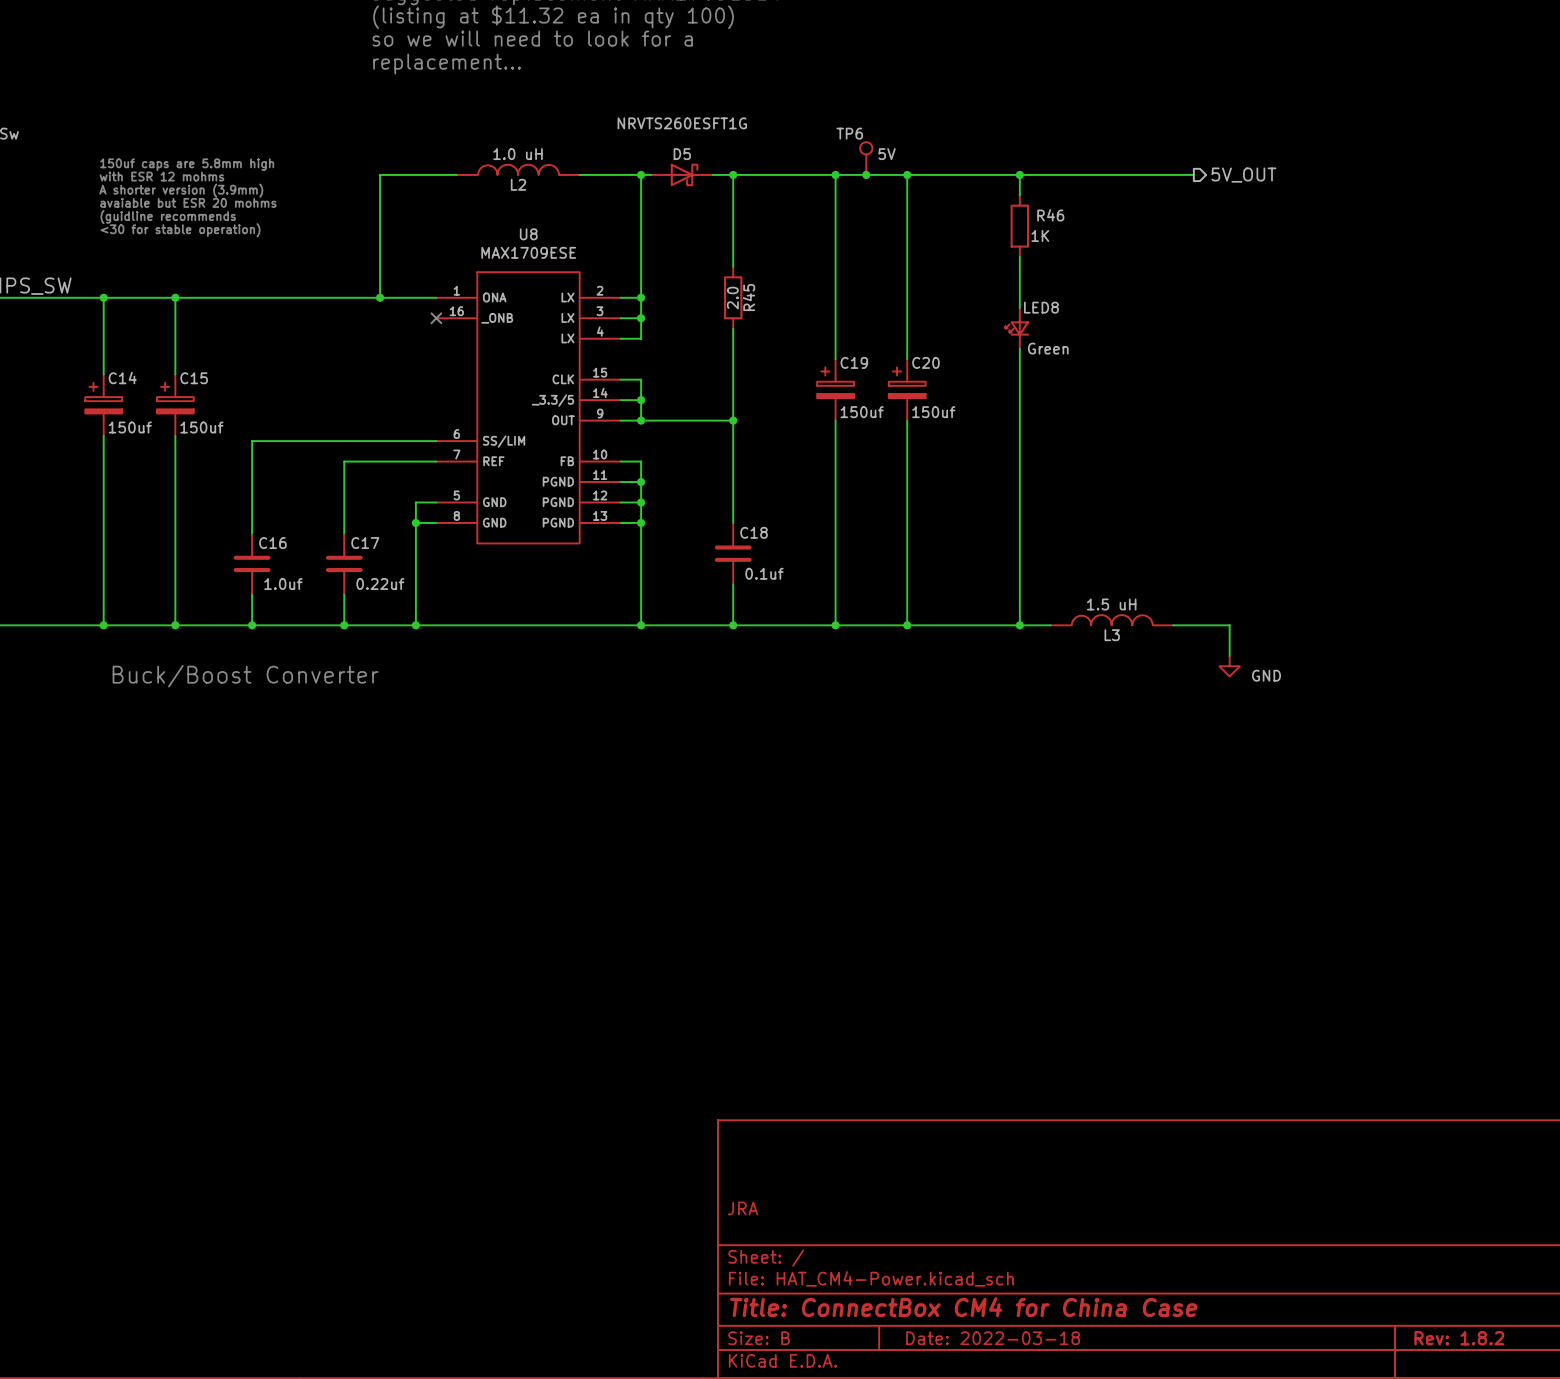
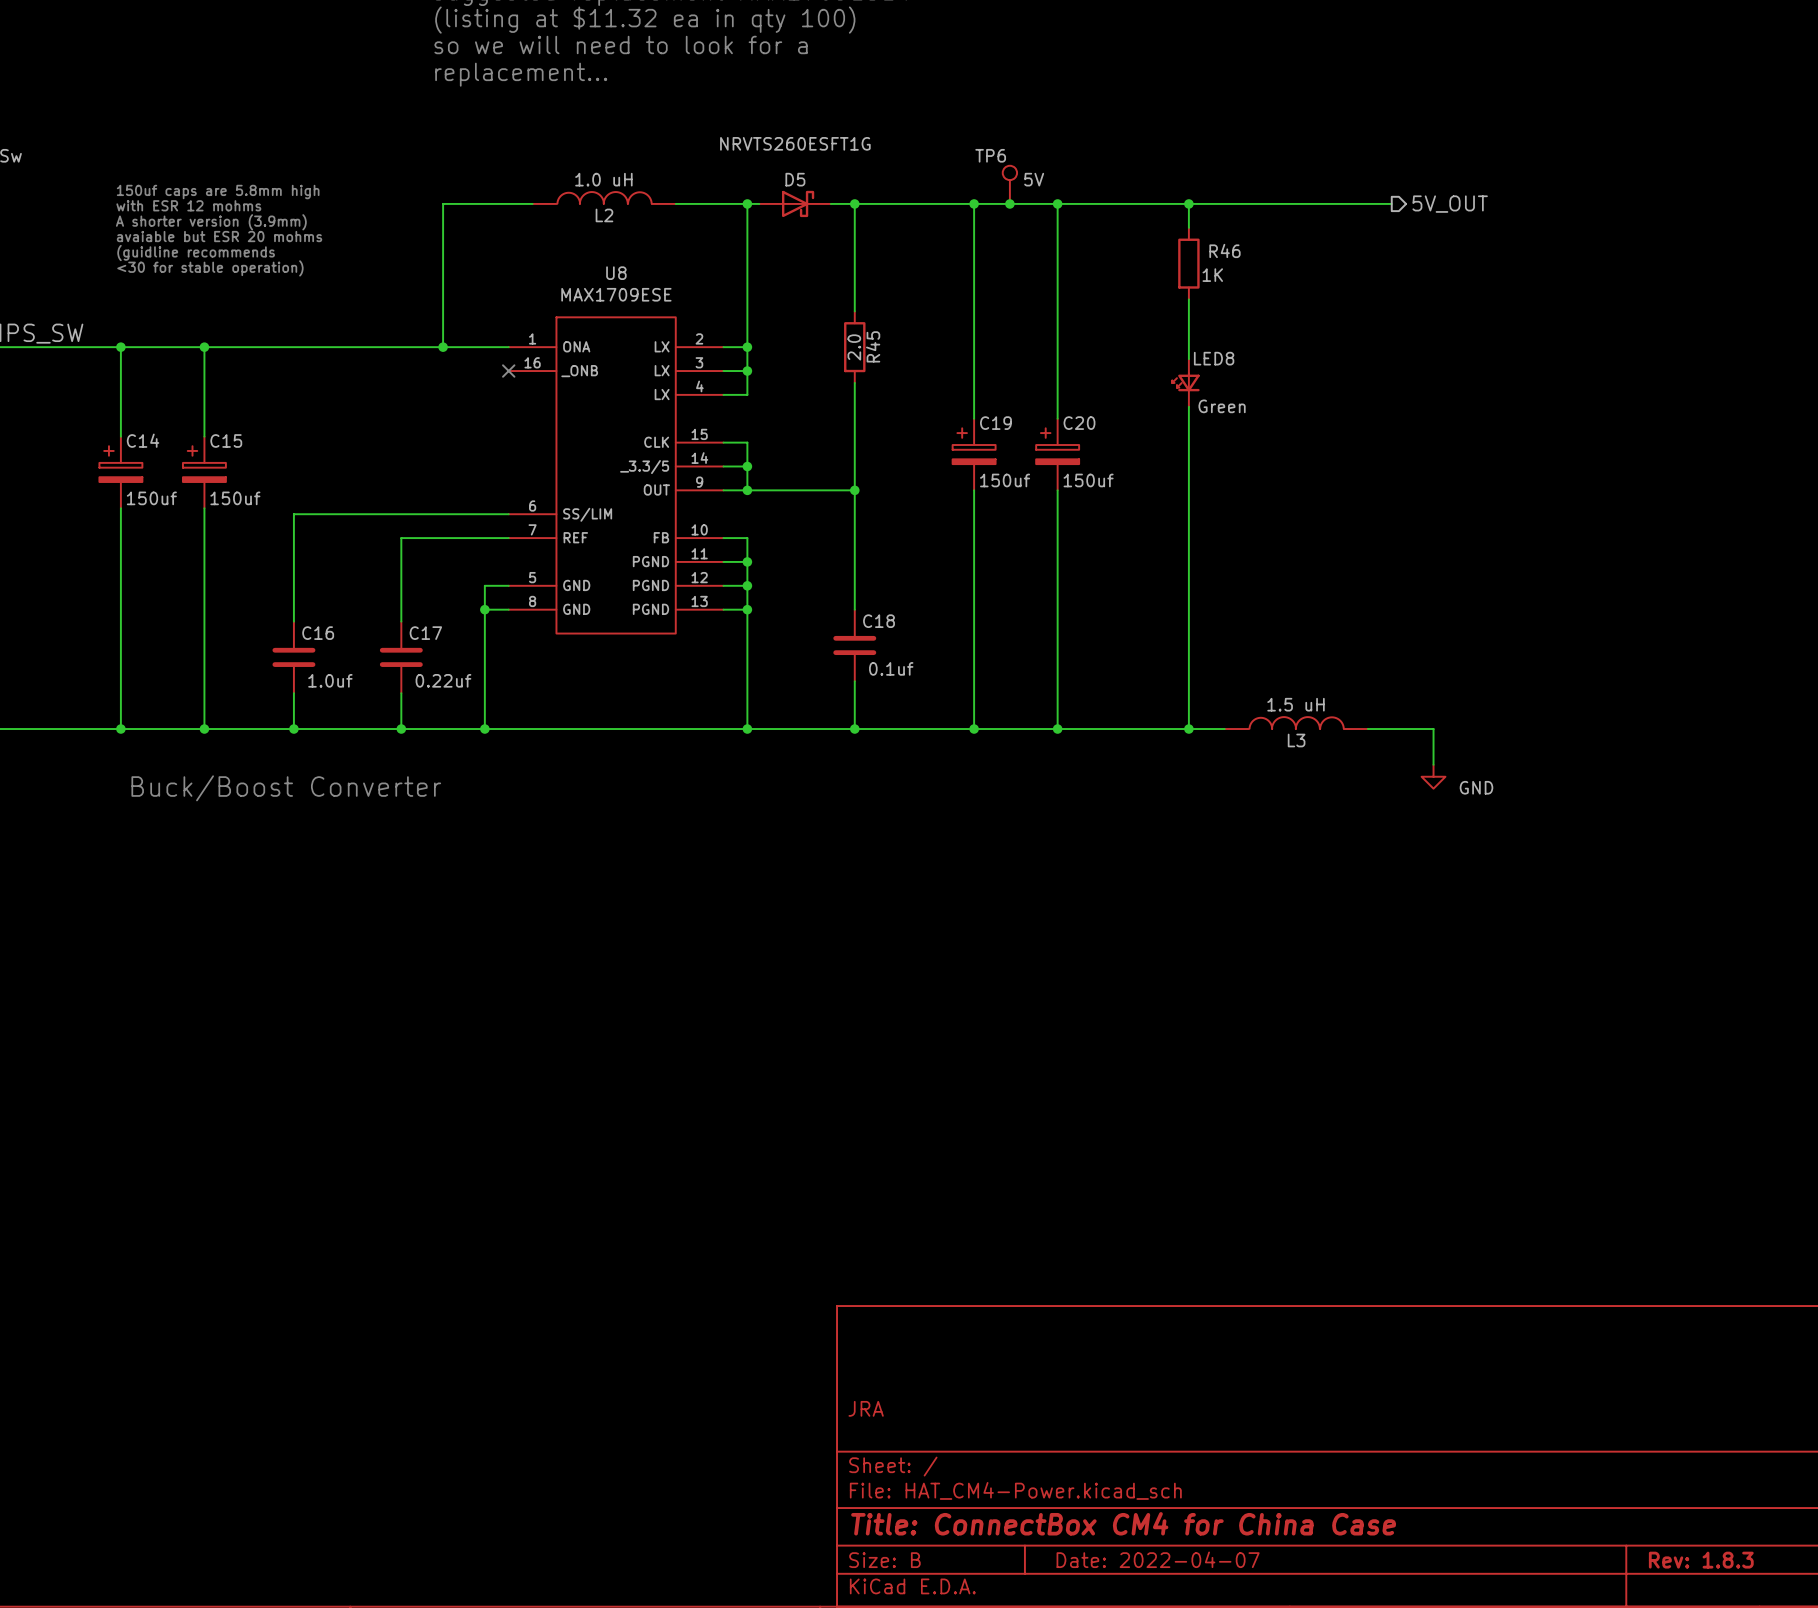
title block: Date: 2022-03-18 (993, 1338) -> Date: 2022-04-07 (1158, 1559)
title block: Rev: 1.8.2 (1459, 1338) -> Rev: 1.8.3 (1701, 1560)

